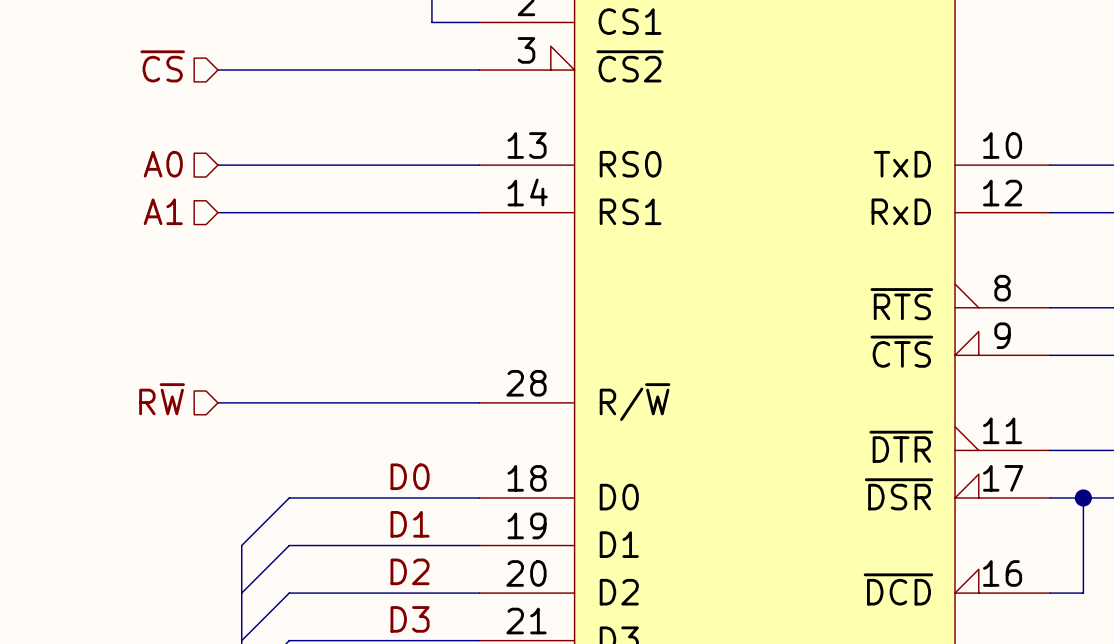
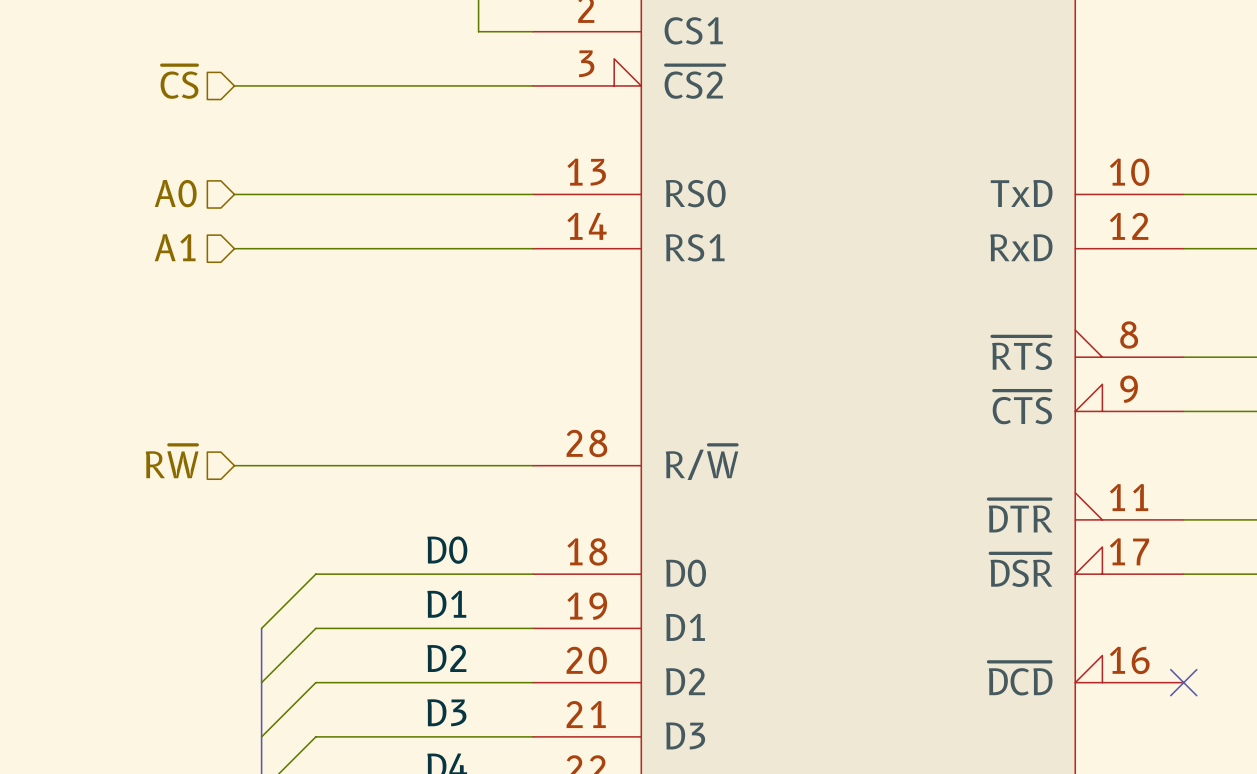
wire: (1083, 497) (1083, 593) (1050, 593) -> none
junction: (1083, 497) -> none
no-connect mark: none -> (1183, 682)

